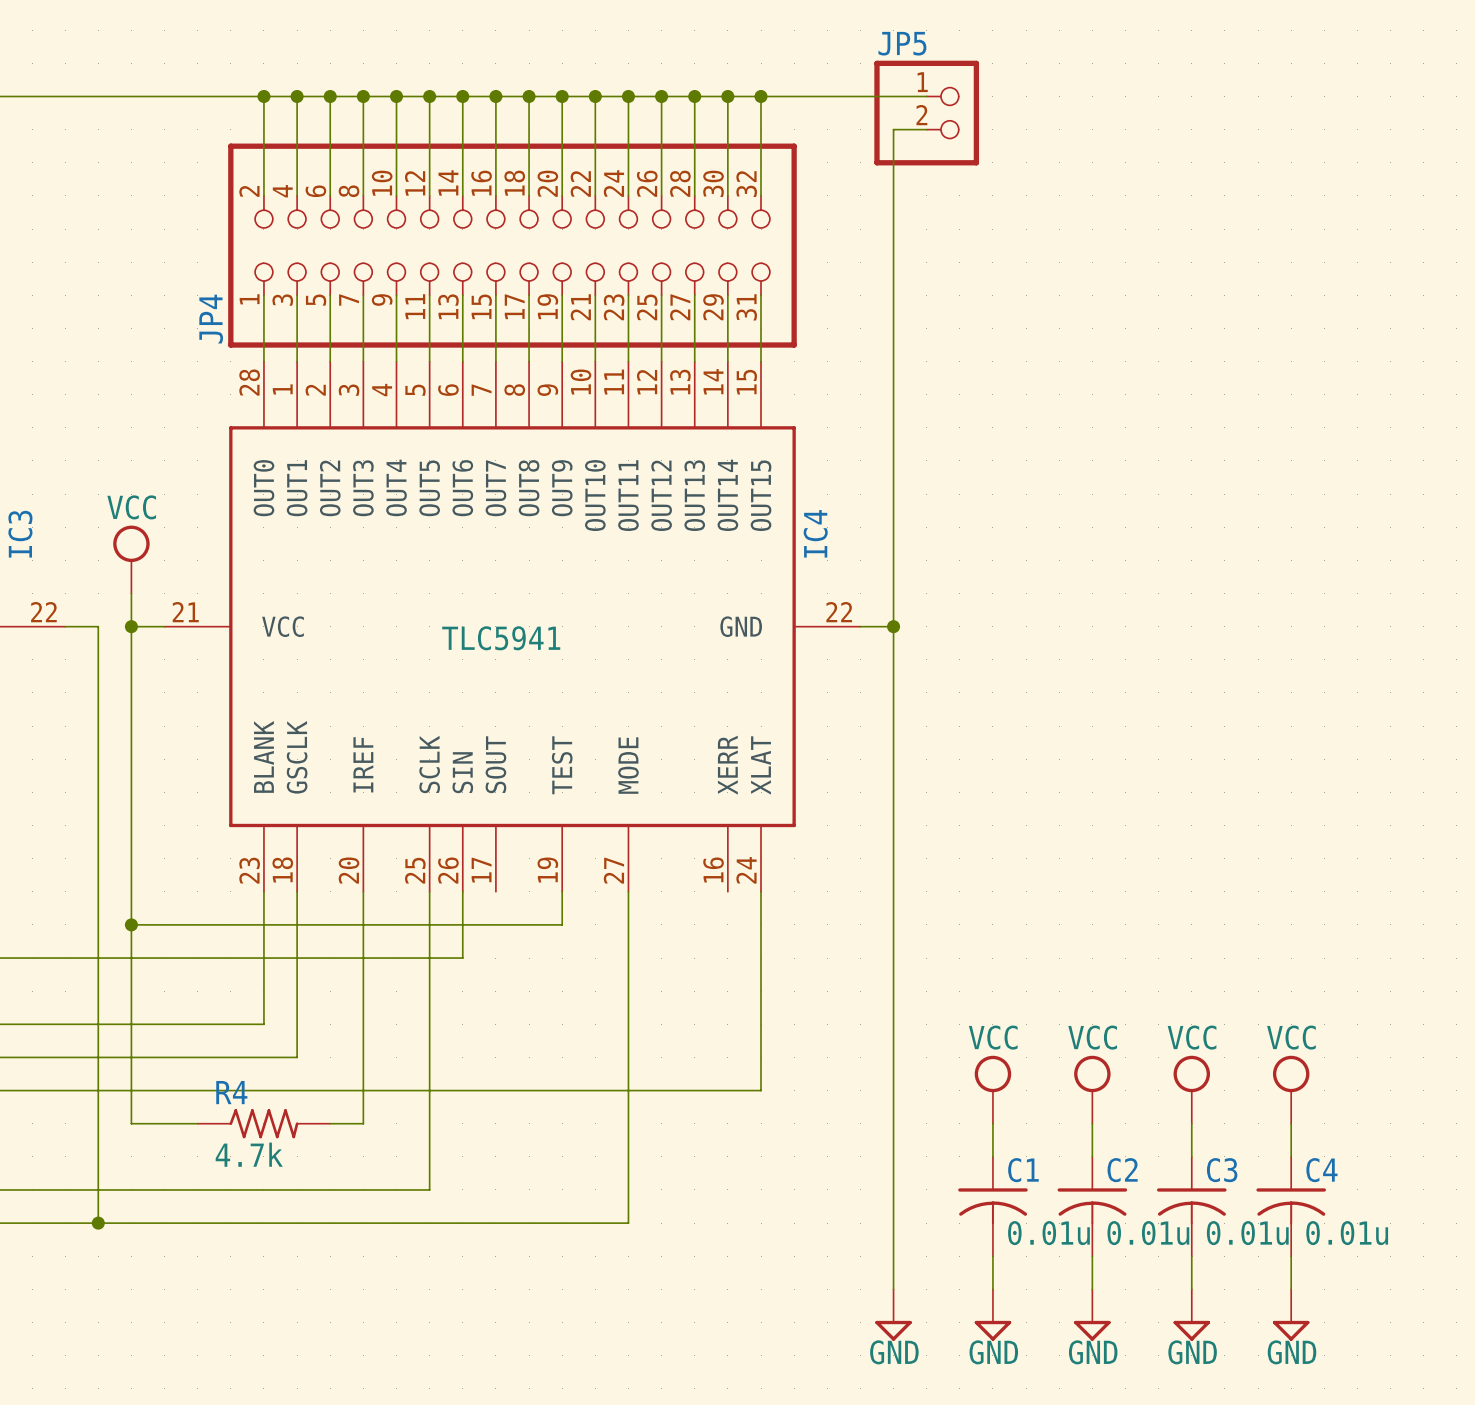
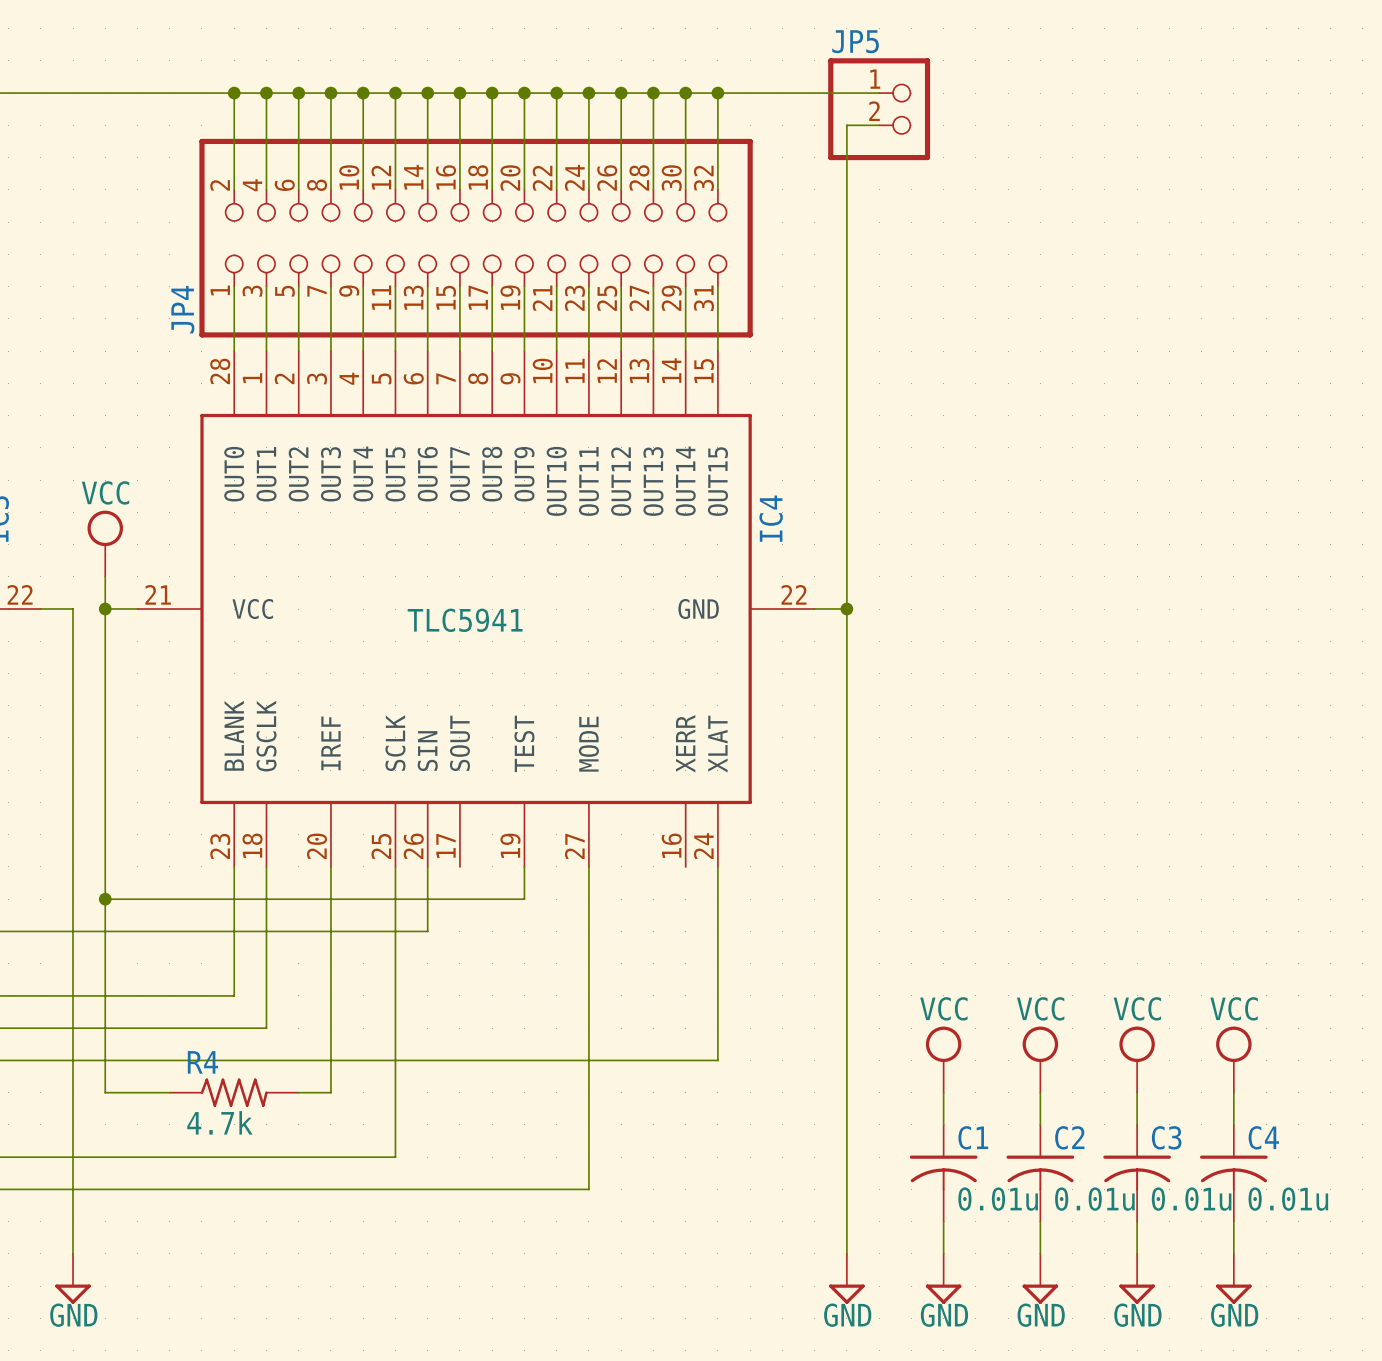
wire: none -> (73, 1189) (73, 1253)
junction: (98, 1223) -> none
power symbol: none -> GND (73, 1278)

